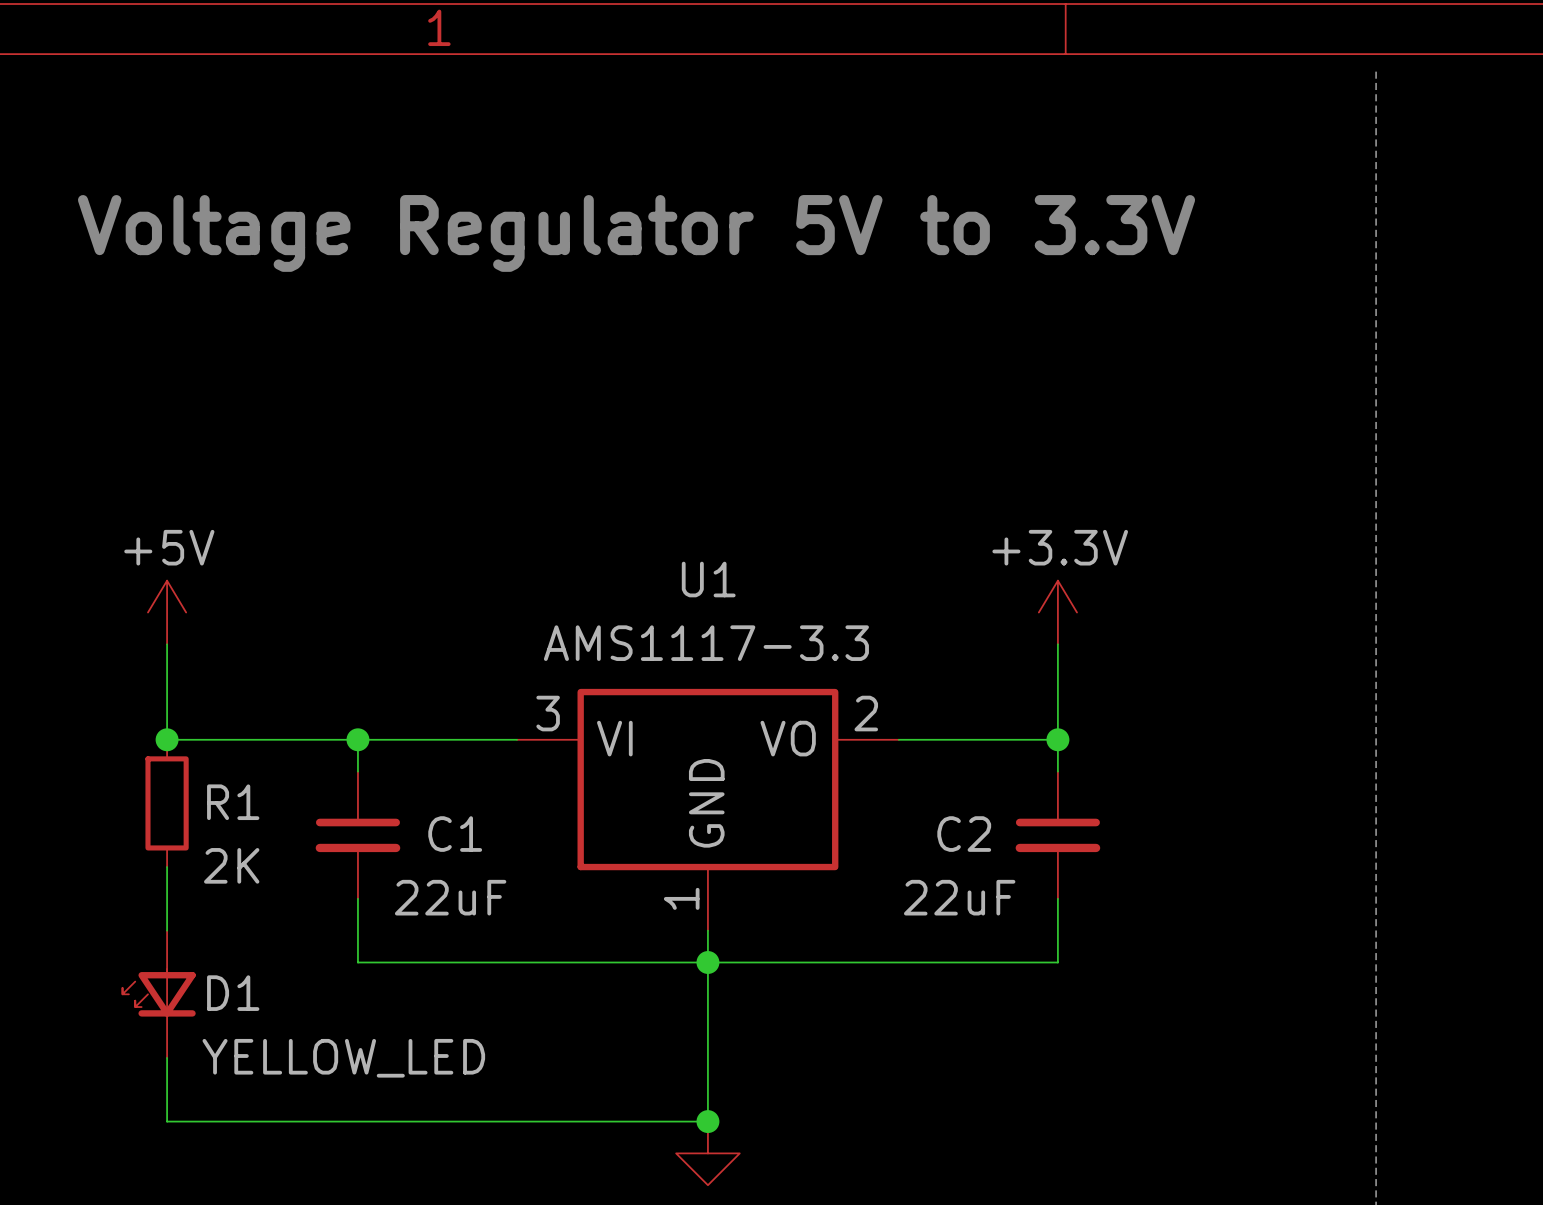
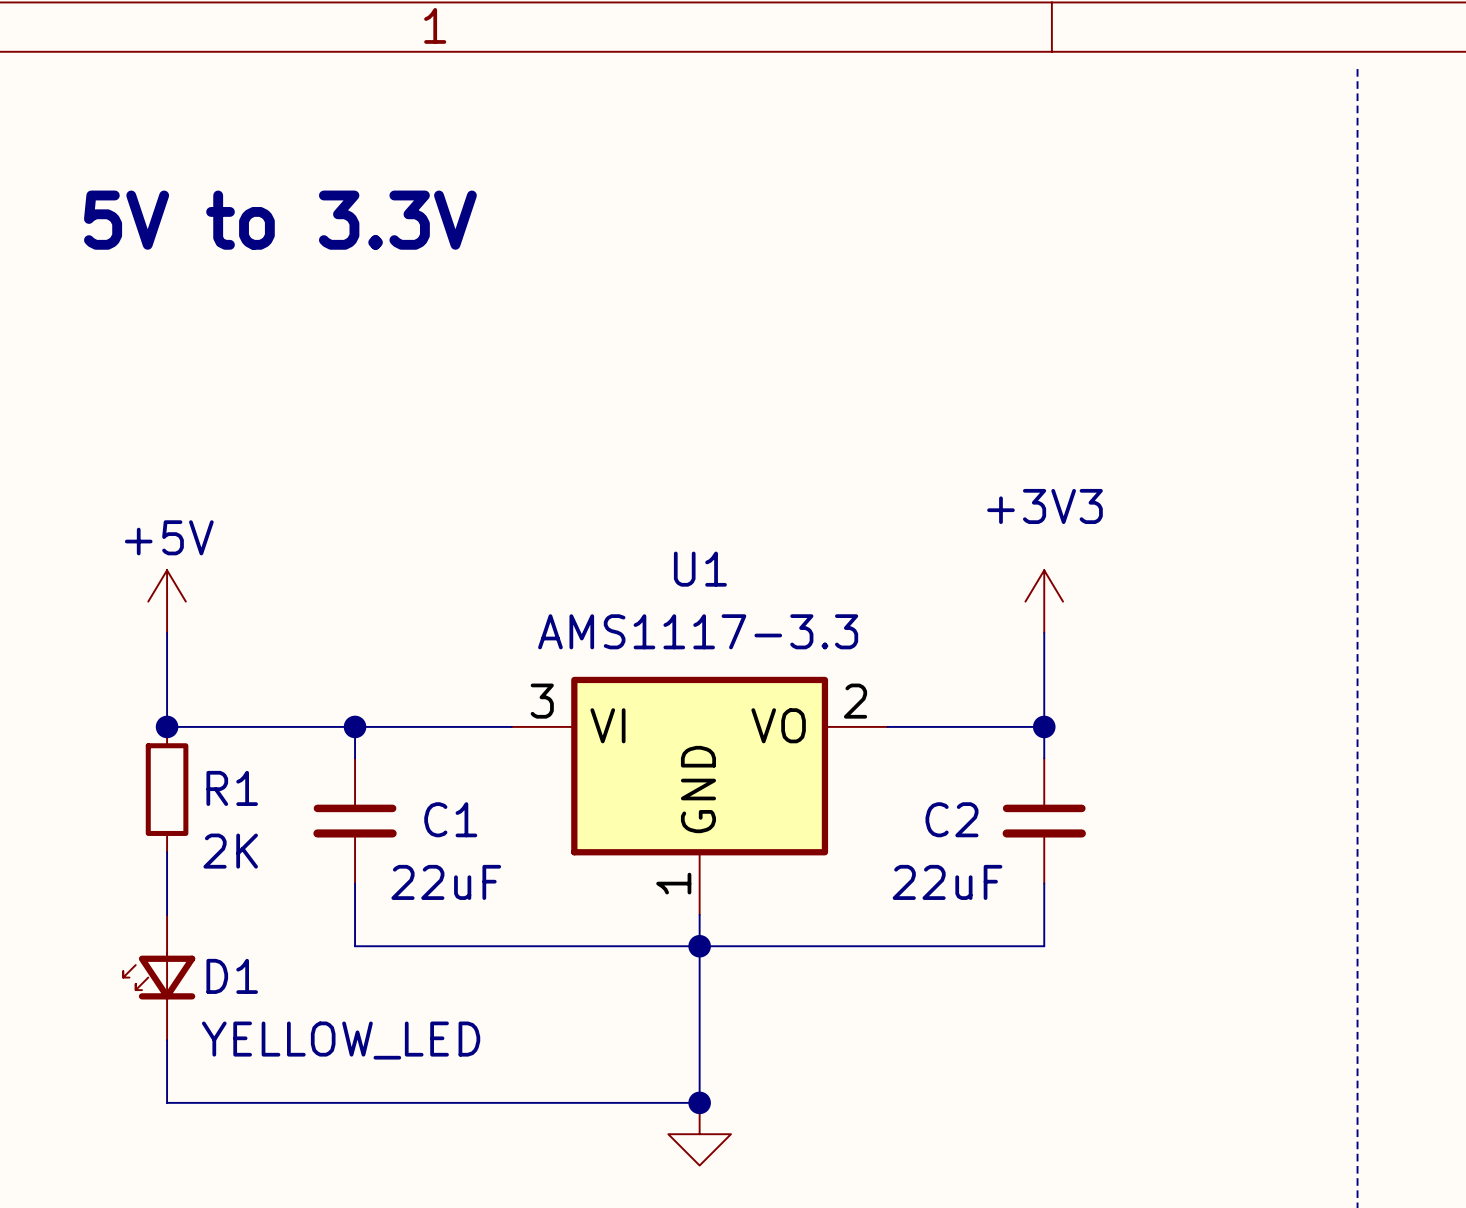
text: Voltage Regulator 5V to 3.3V (636, 233) -> 5V to 3.3V (280, 220)
power symbol: +3.3V (1057, 612) -> +3V3 (1044, 601)

